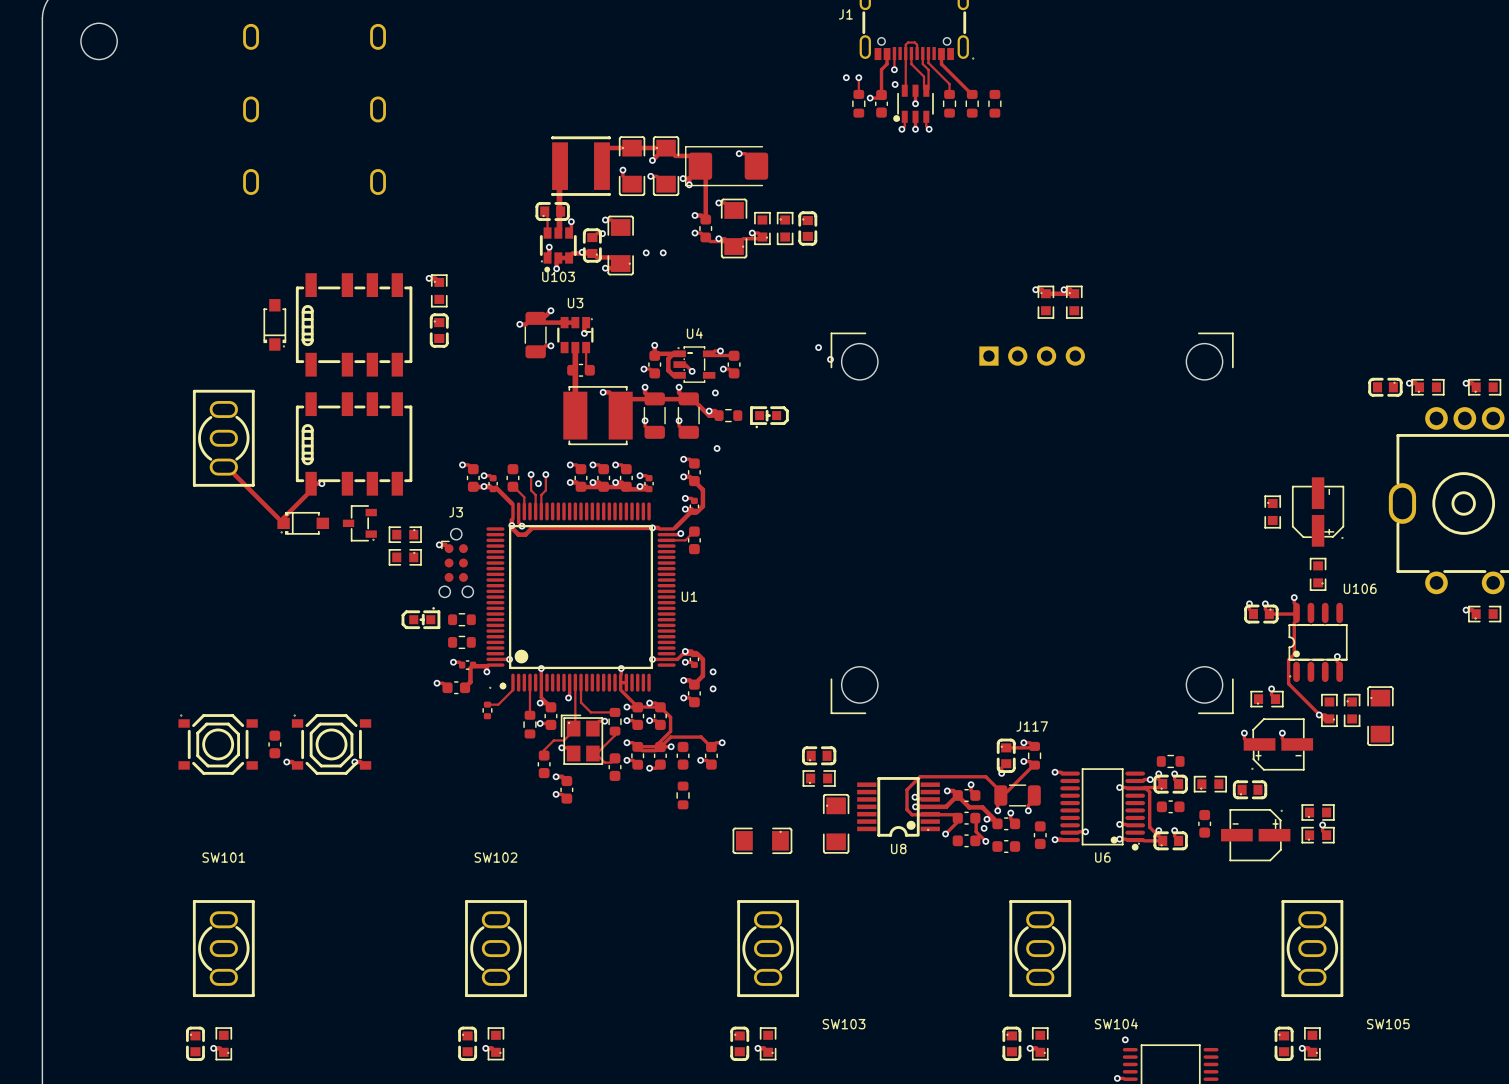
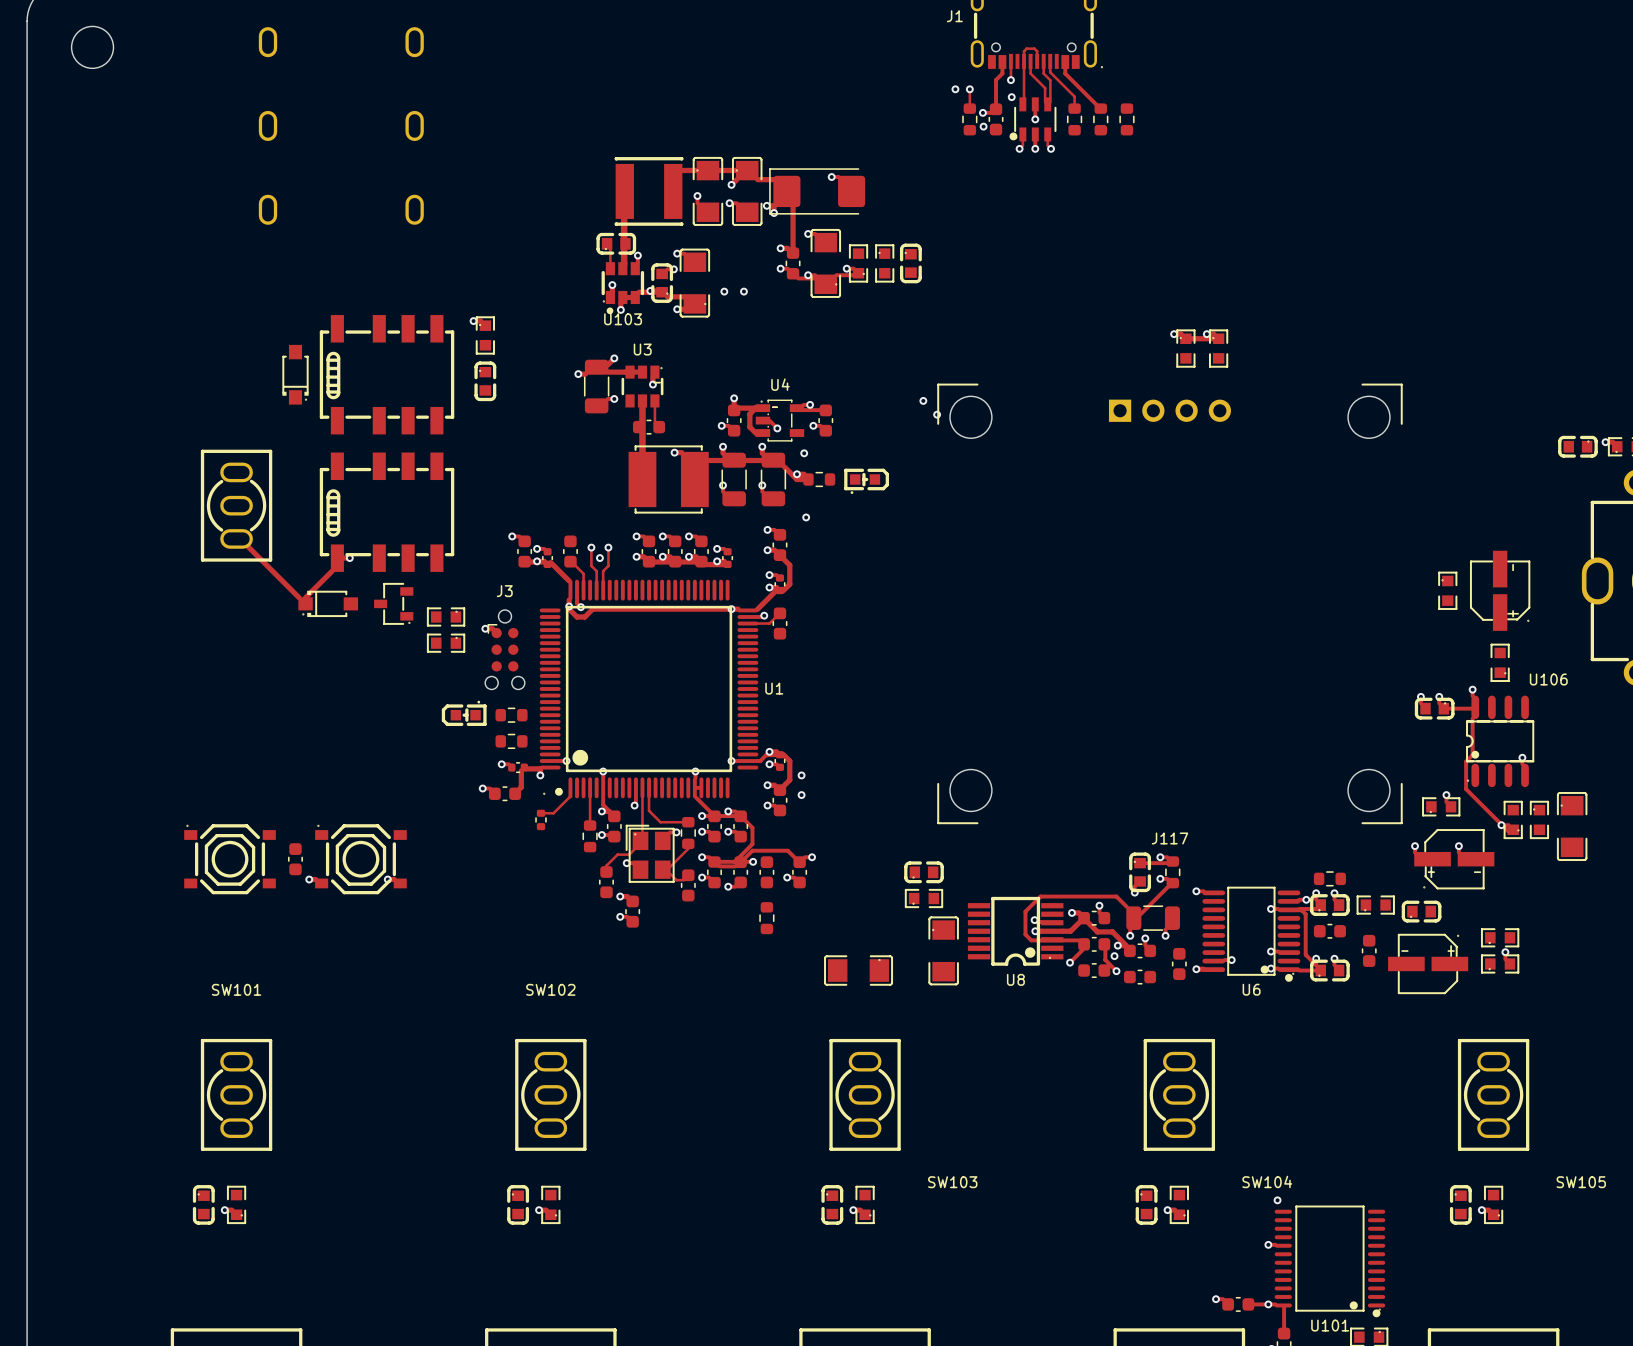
via: none -> (983, 126)

